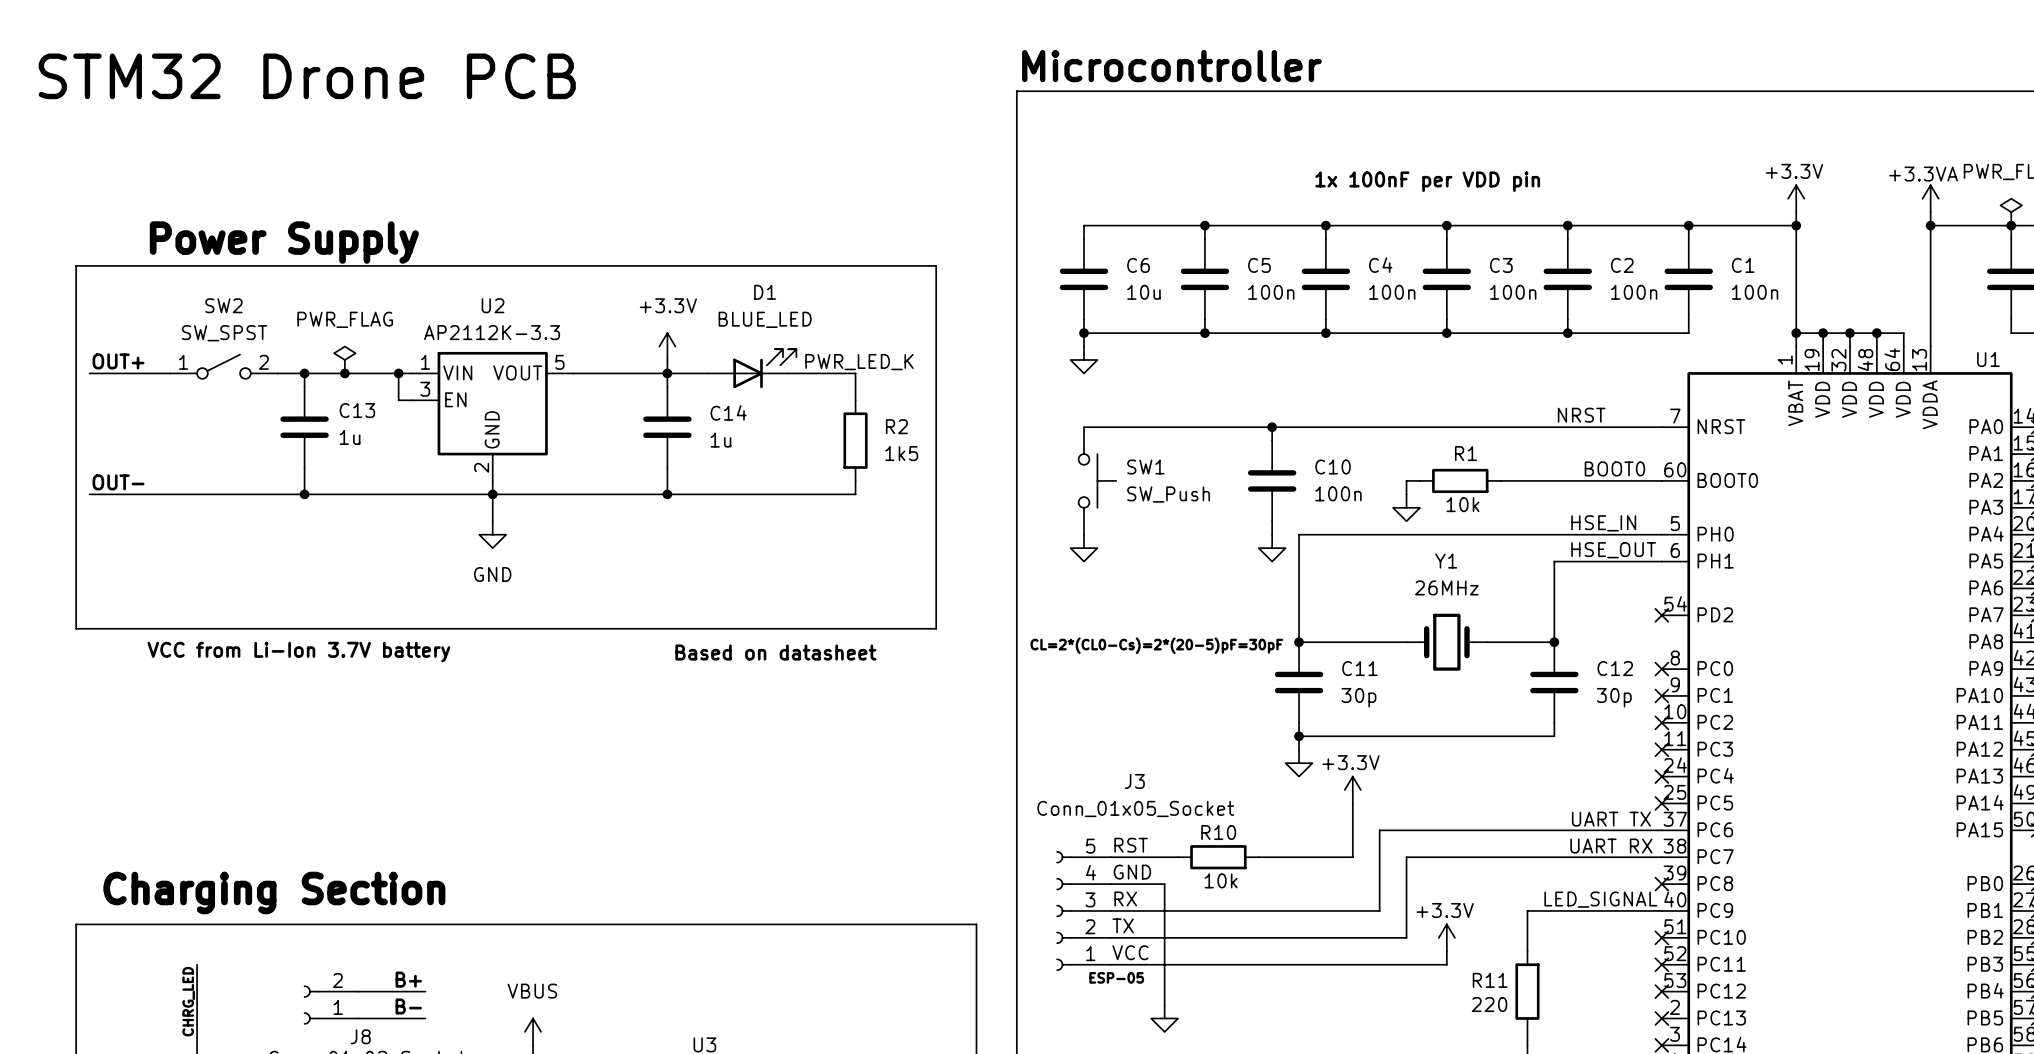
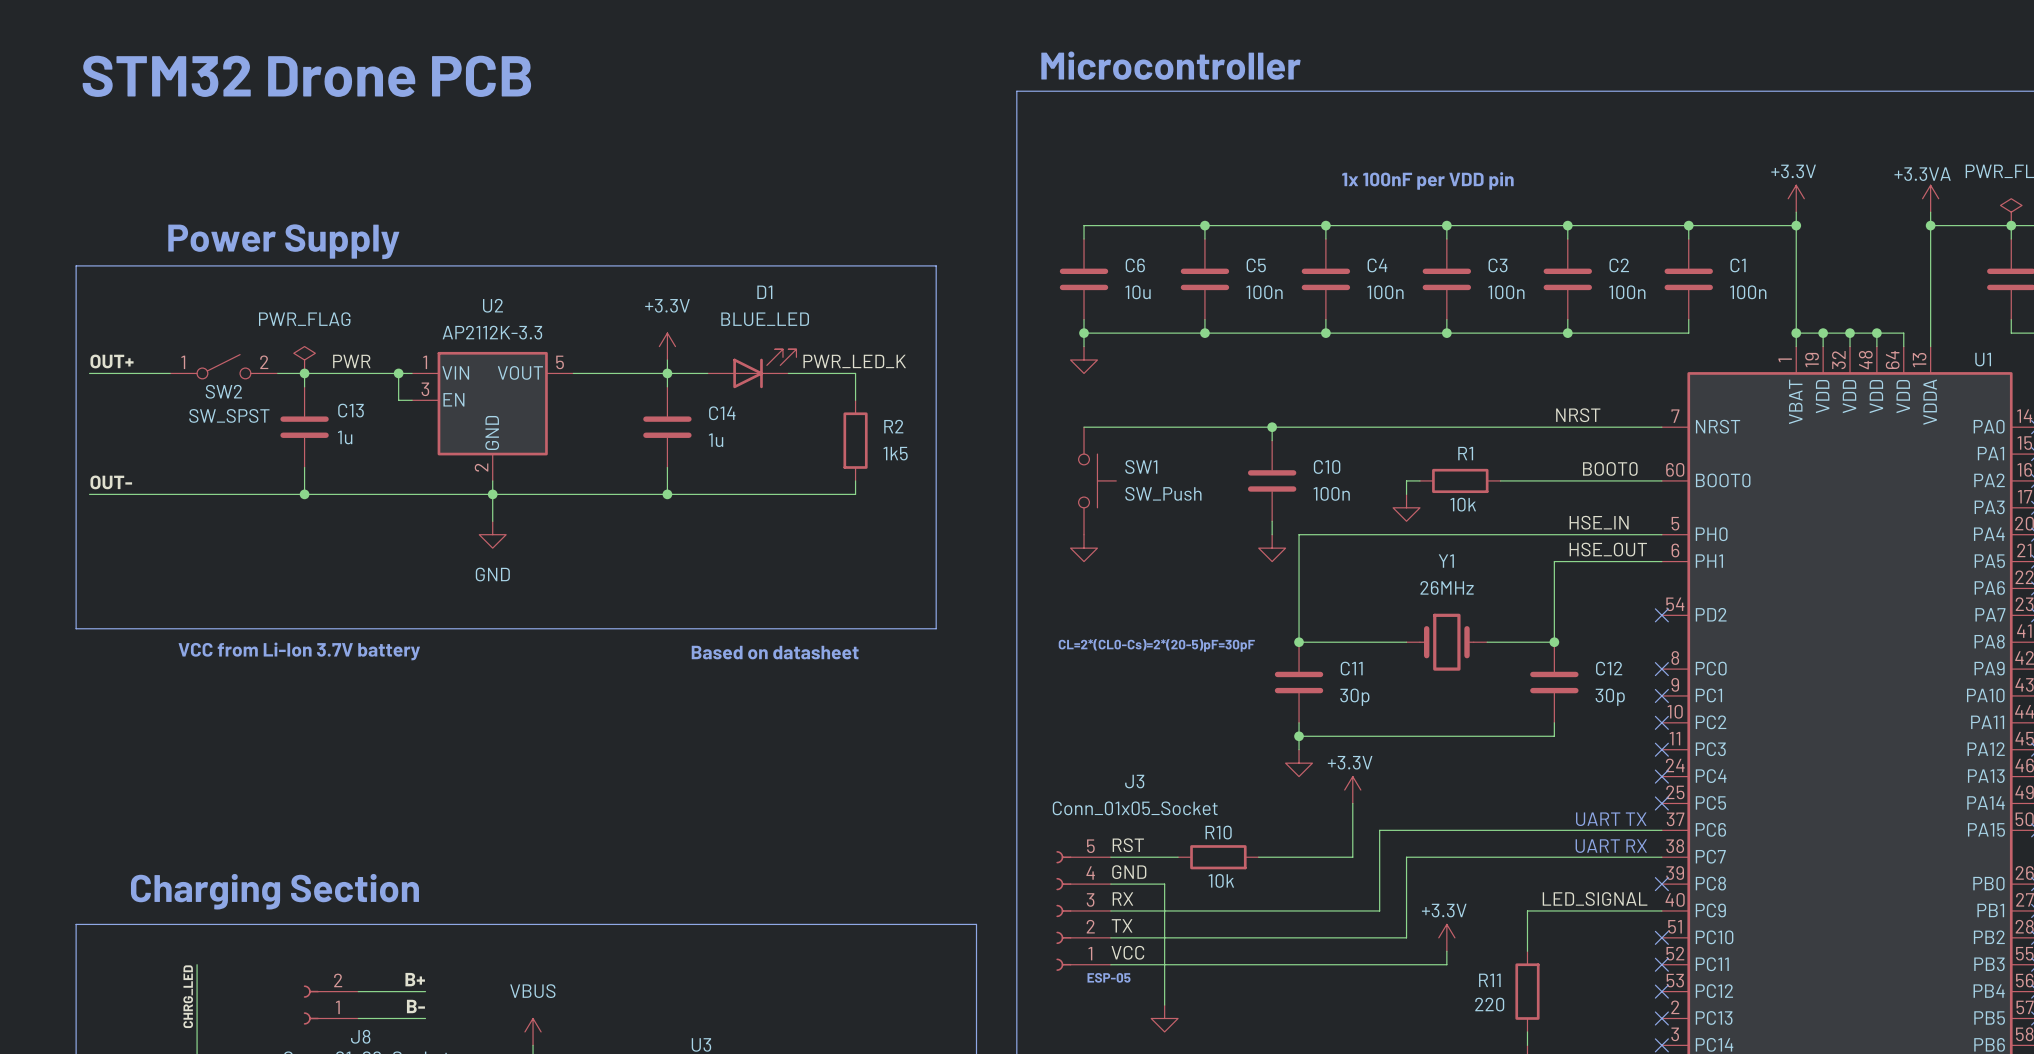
SW2 name position: SW2 (223, 305) -> SW2 (223, 391)
SW2 value position: SW_SPST (224, 333) -> SW_SPST (229, 415)
power symbol position: PWR_FLAG (344, 360) -> PWR_FLAG (304, 360)
label: none -> PWR (351, 361)
junction: (344, 373) -> none

